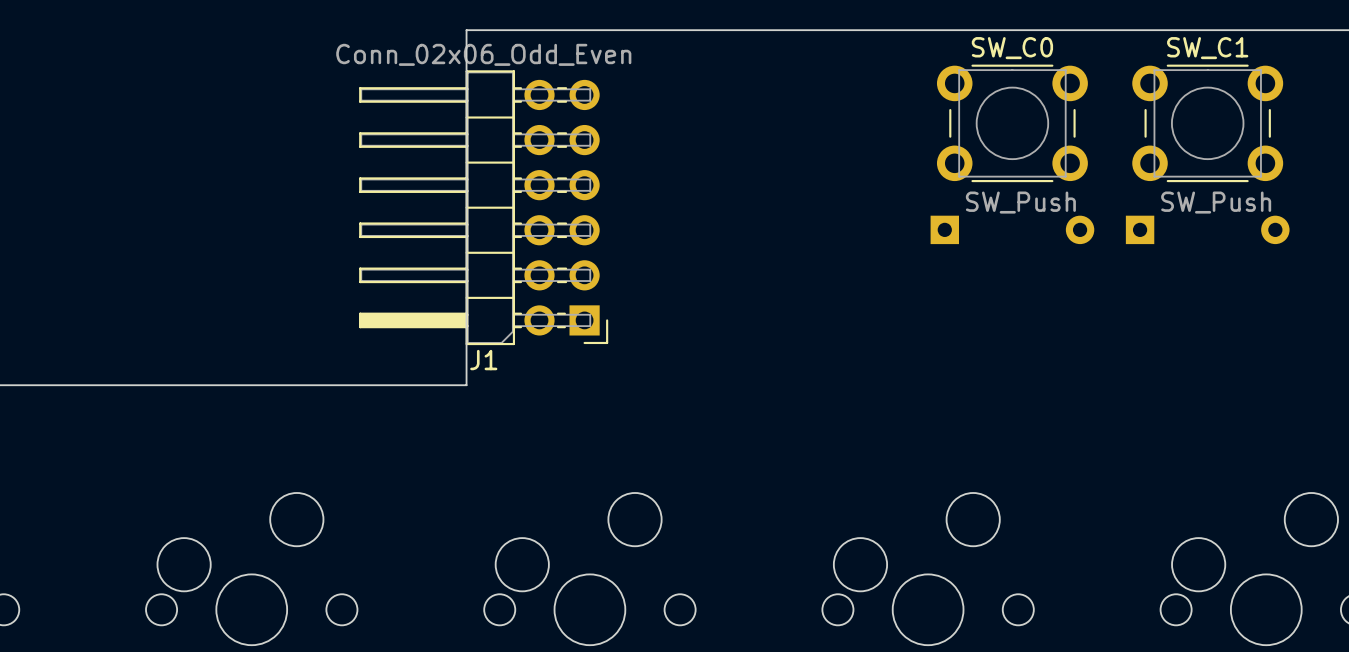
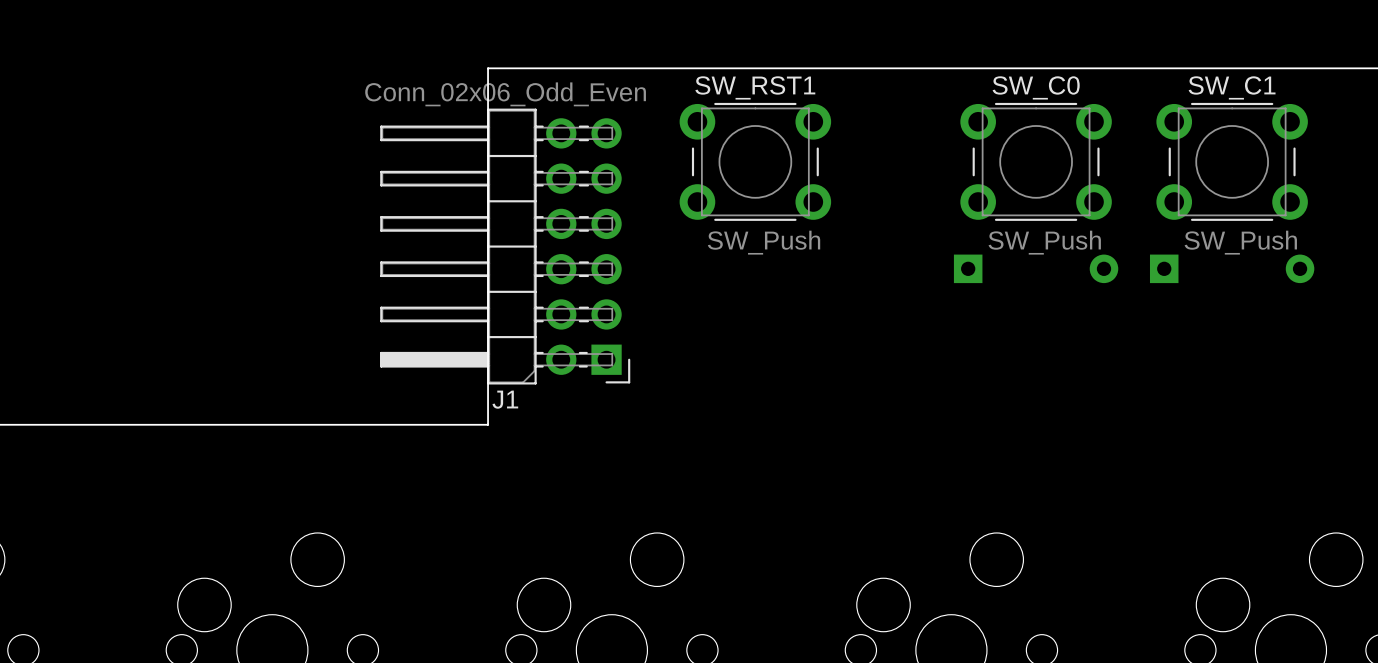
SW_RST1: none -> SW_Push (755, 161)

